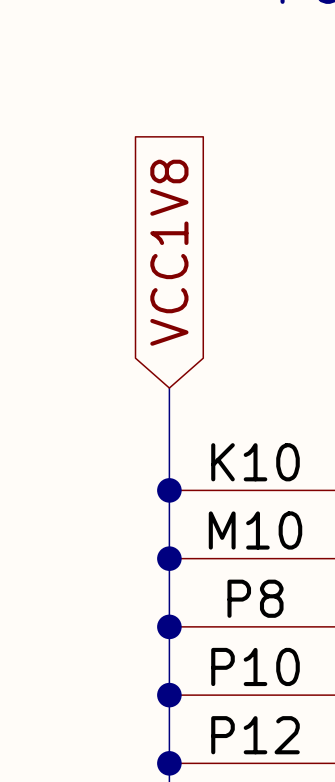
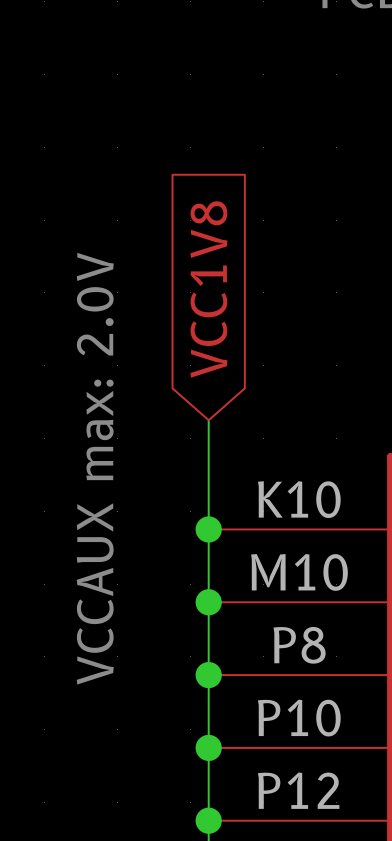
text: none -> VCCAUX max: 2.0V (95, 468)

